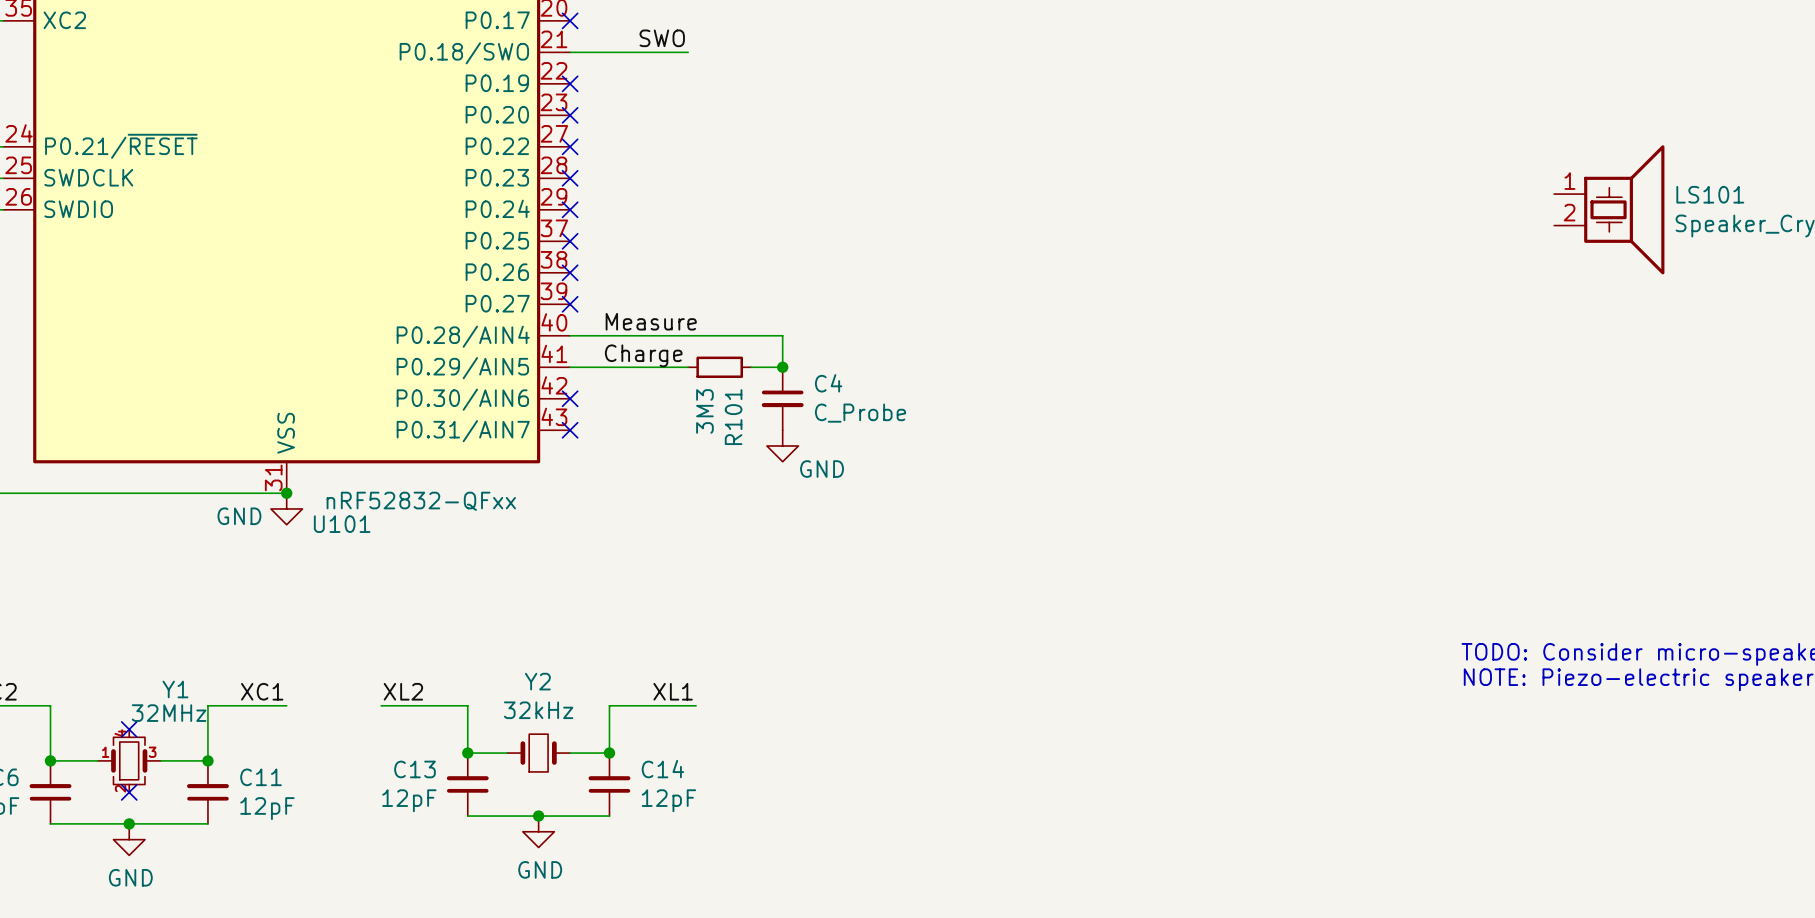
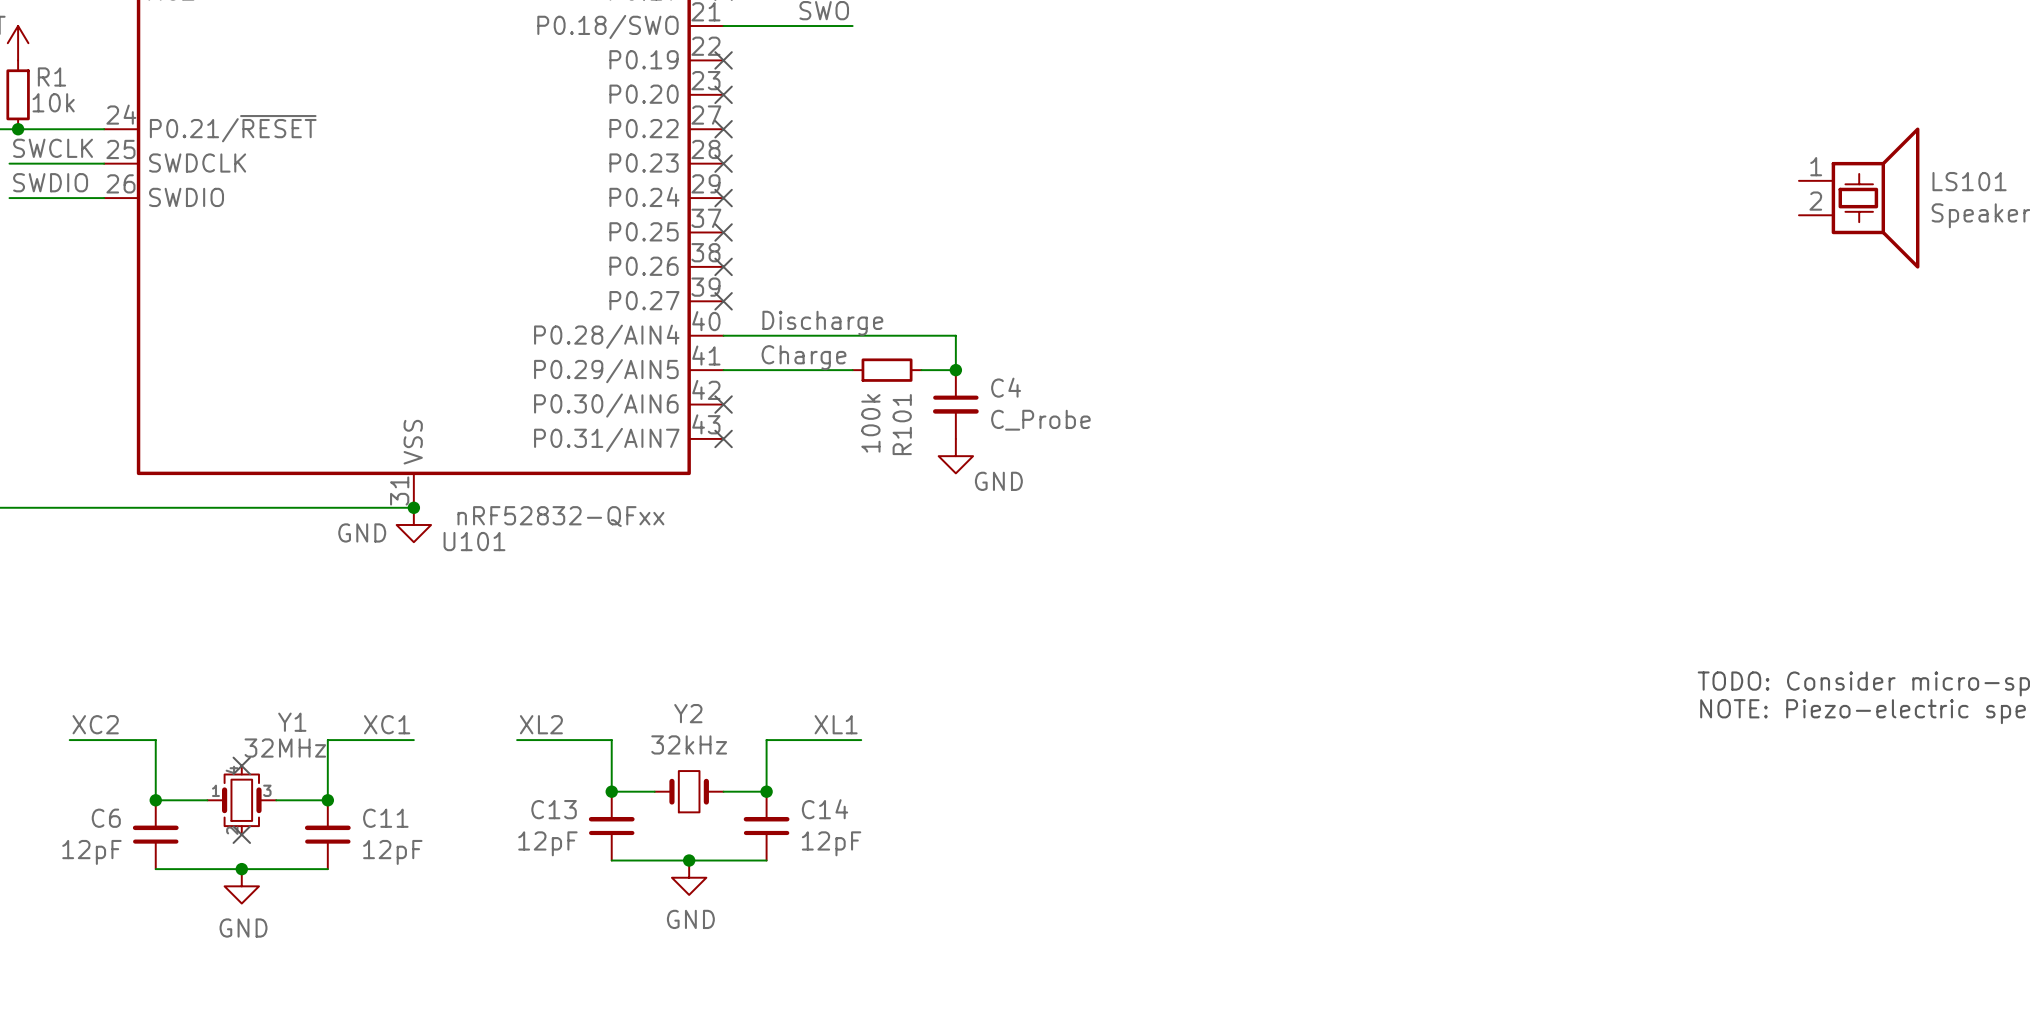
label: Measure (651, 321) -> Discharge (822, 323)
R101 value: 3M3 (704, 411) -> 100k (870, 423)

